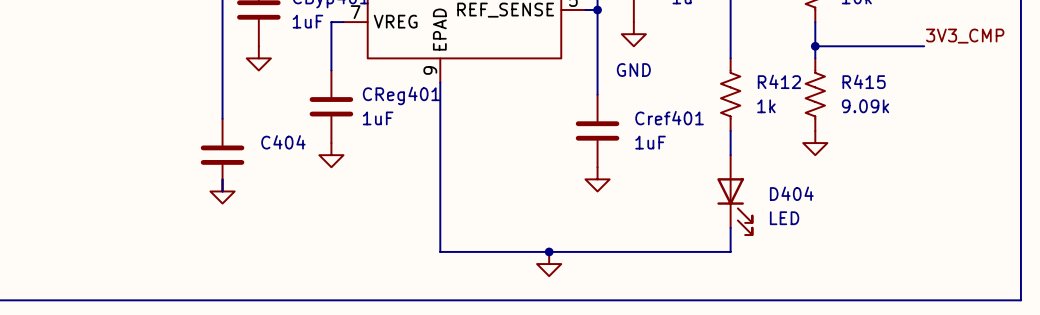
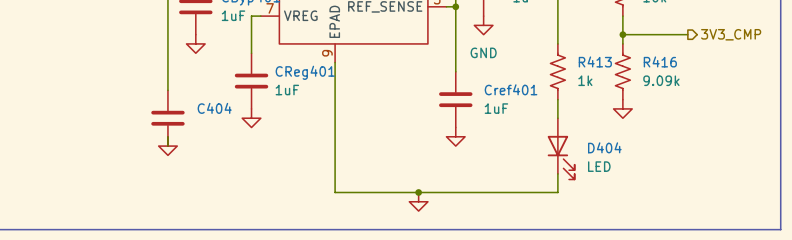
label: 3V3_CMP (965, 36) -> none
wire: (899, 46) (924, 46) -> none
hierarchical label: none -> 3V3_CMP (731, 34)
R412 name: R412 (779, 81) -> R413 (595, 61)
R415 name: R415 (864, 81) -> R416 (660, 61)

